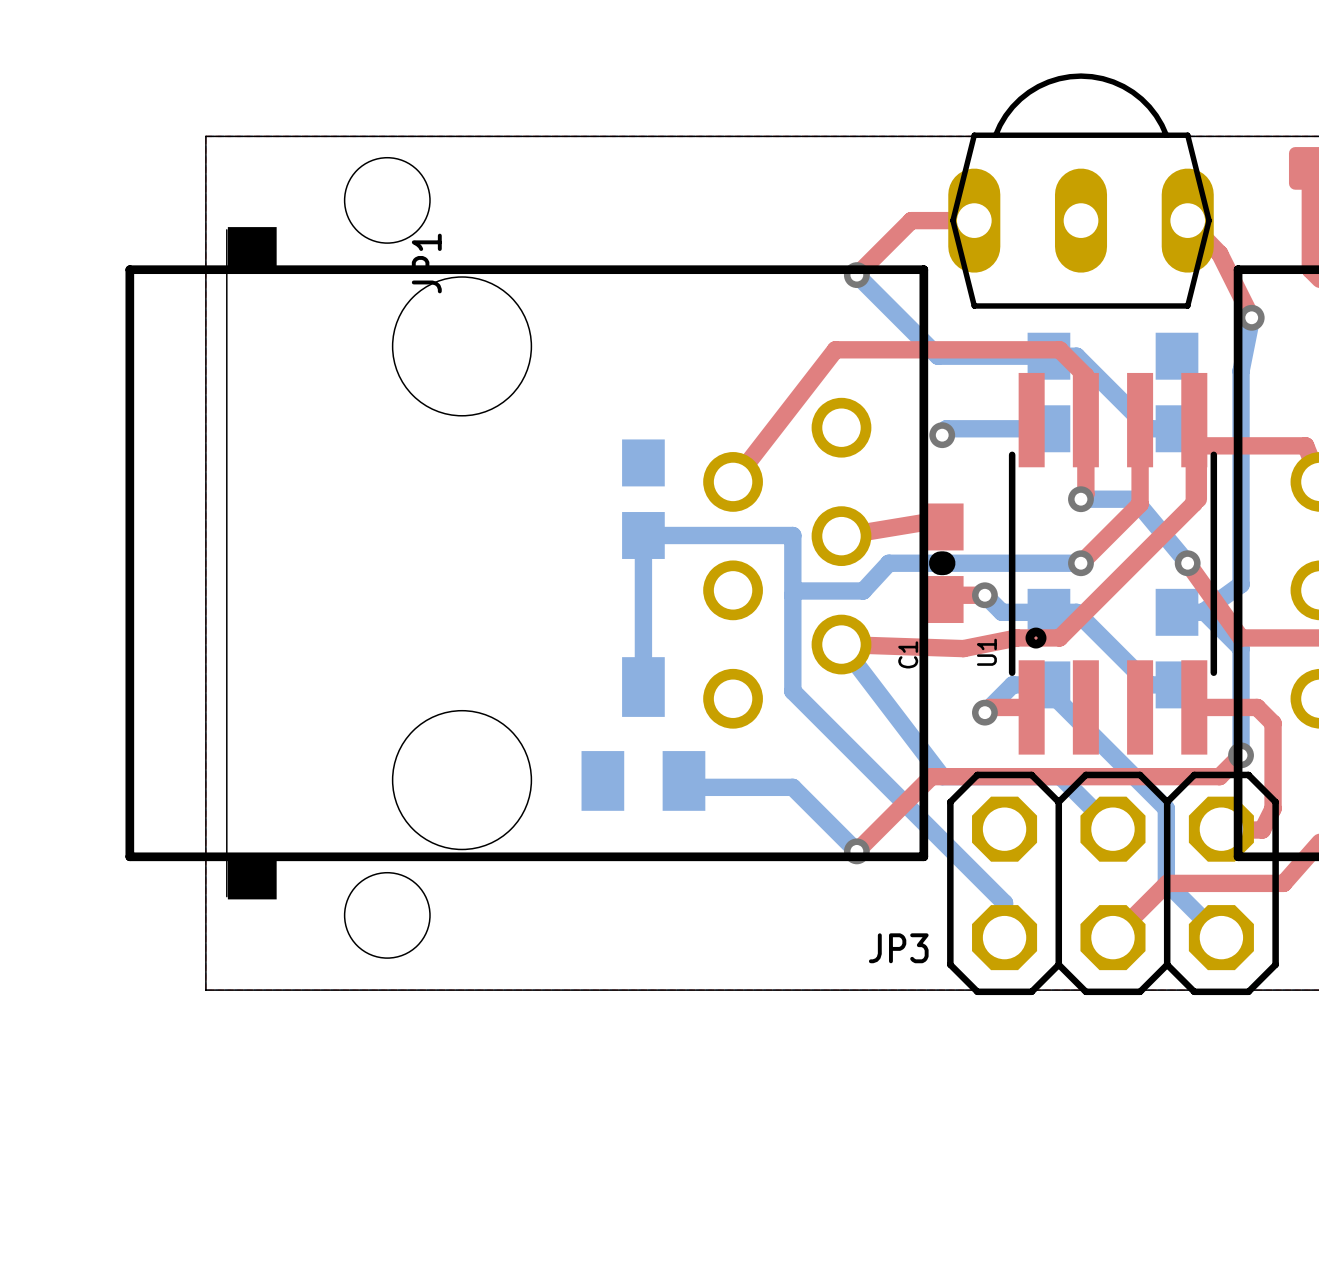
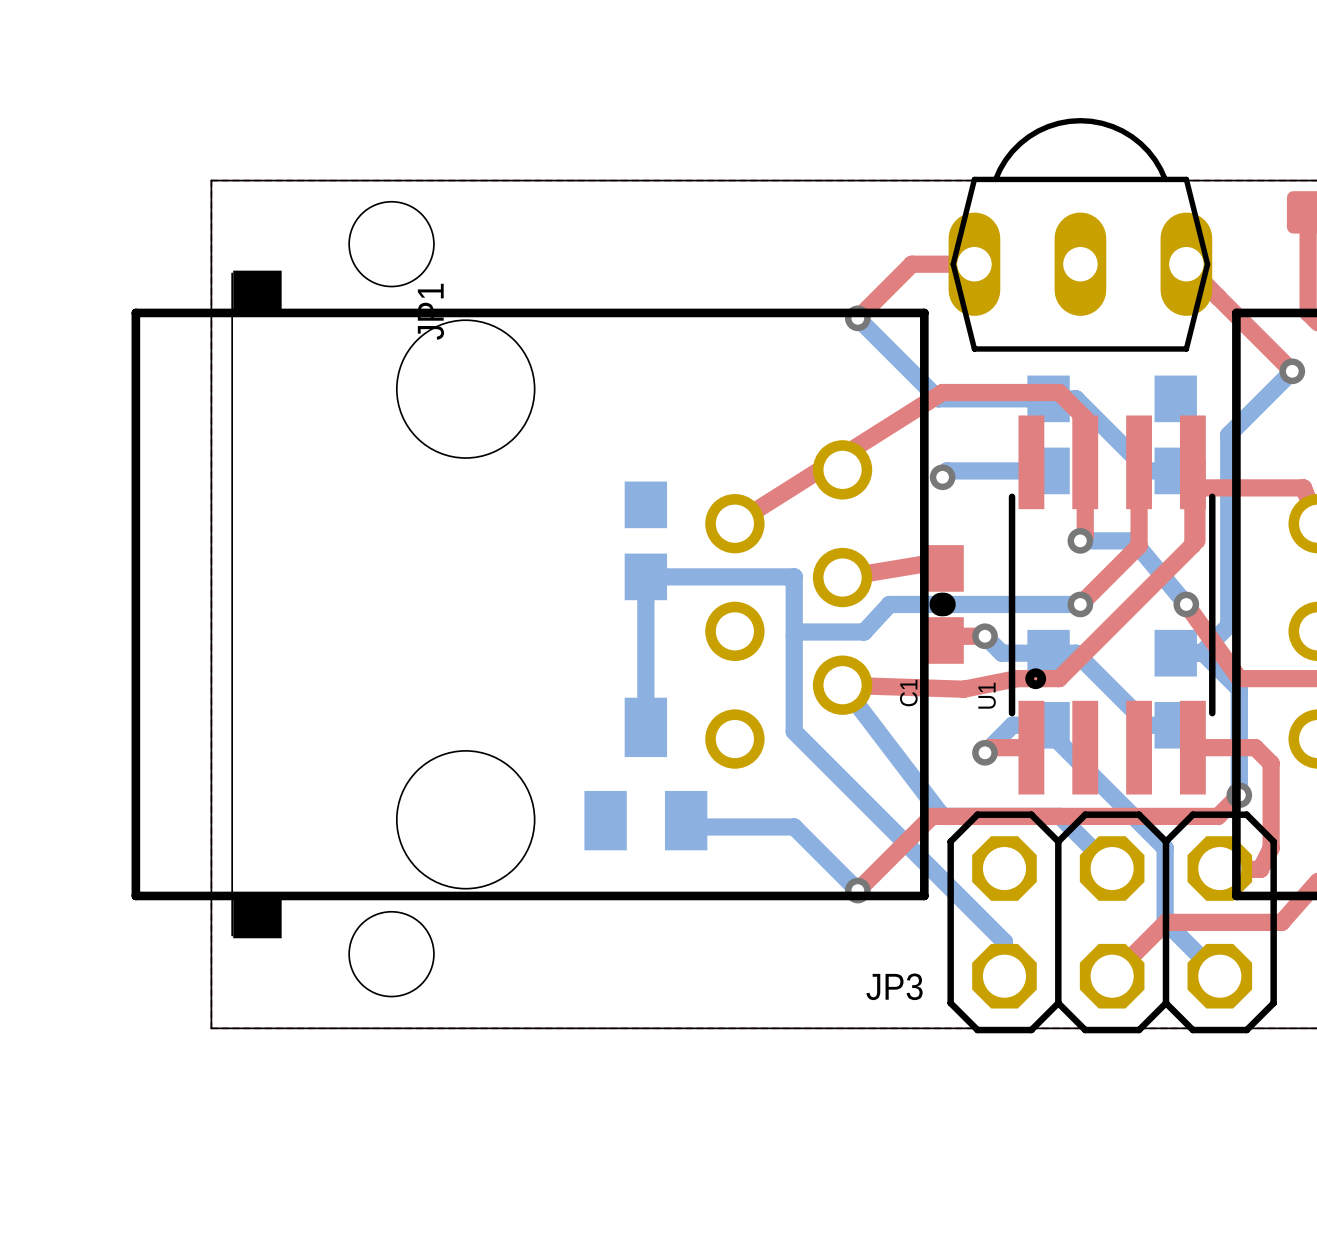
top track: (1219, 253) (1251, 317) -> (1218, 297) (1292, 371)
bottom track: (1251, 317) (1241, 371) (1241, 584) (1202, 612) -> (1292, 371) (1228, 434) (1228, 625) (1201, 653)
via position: (1251, 317) -> (1292, 371)
top track: (942, 349) (835, 349) (733, 481) -> (942, 392) (734, 523)

